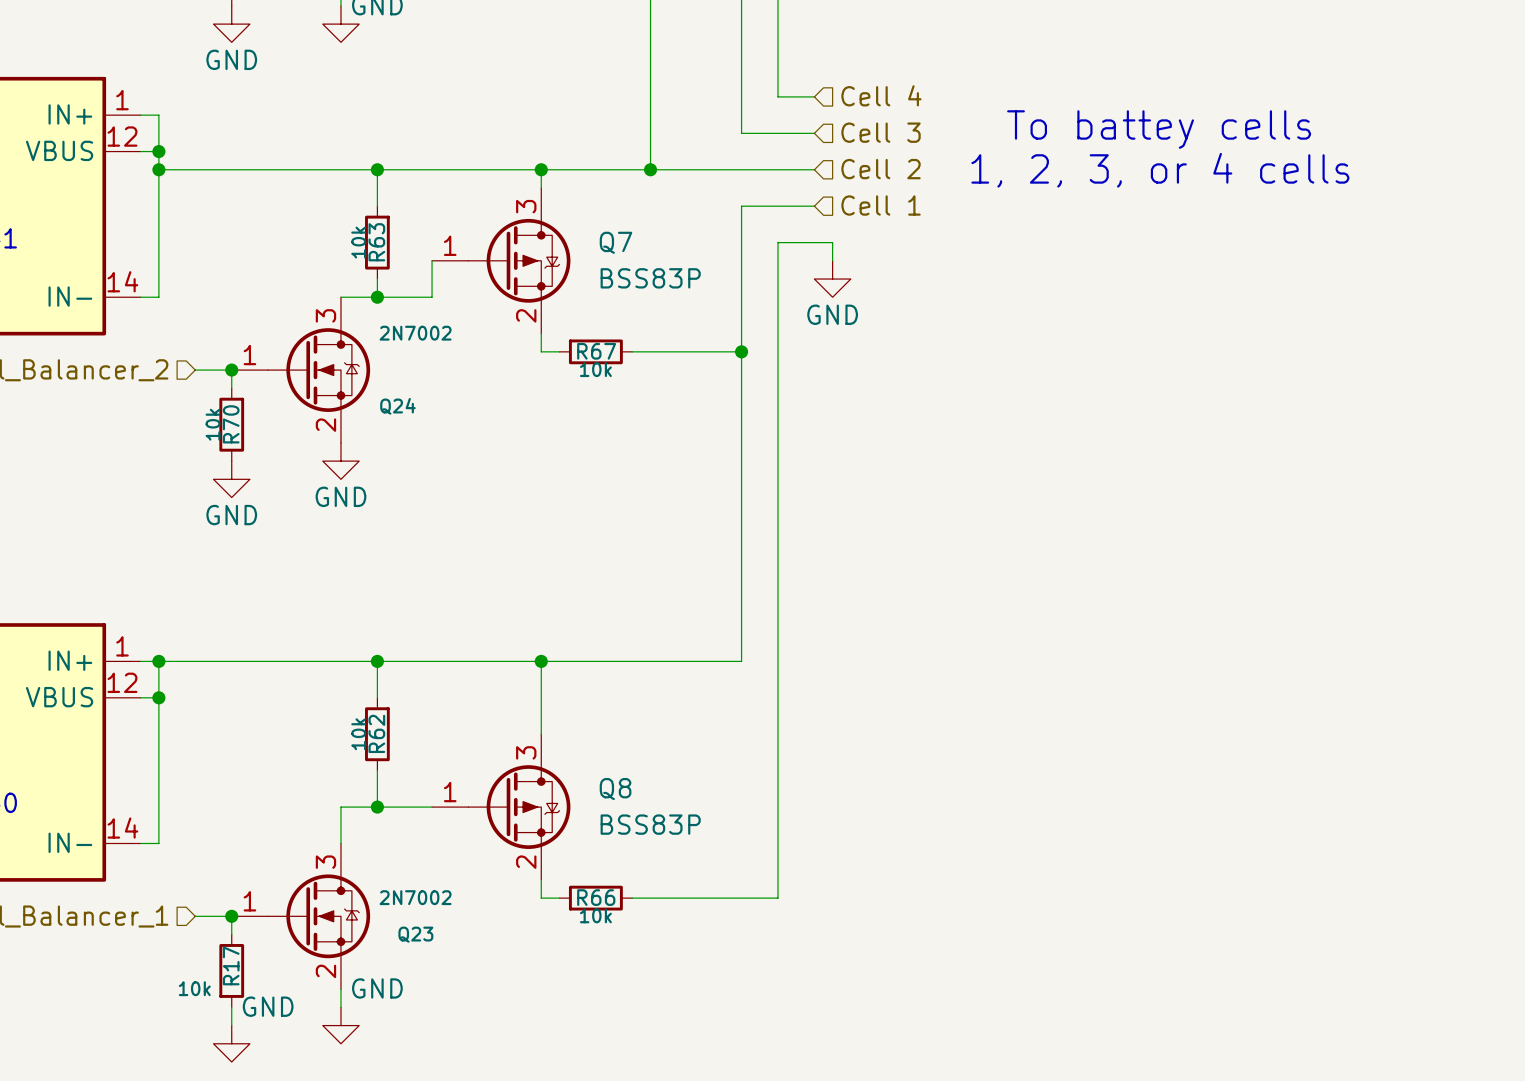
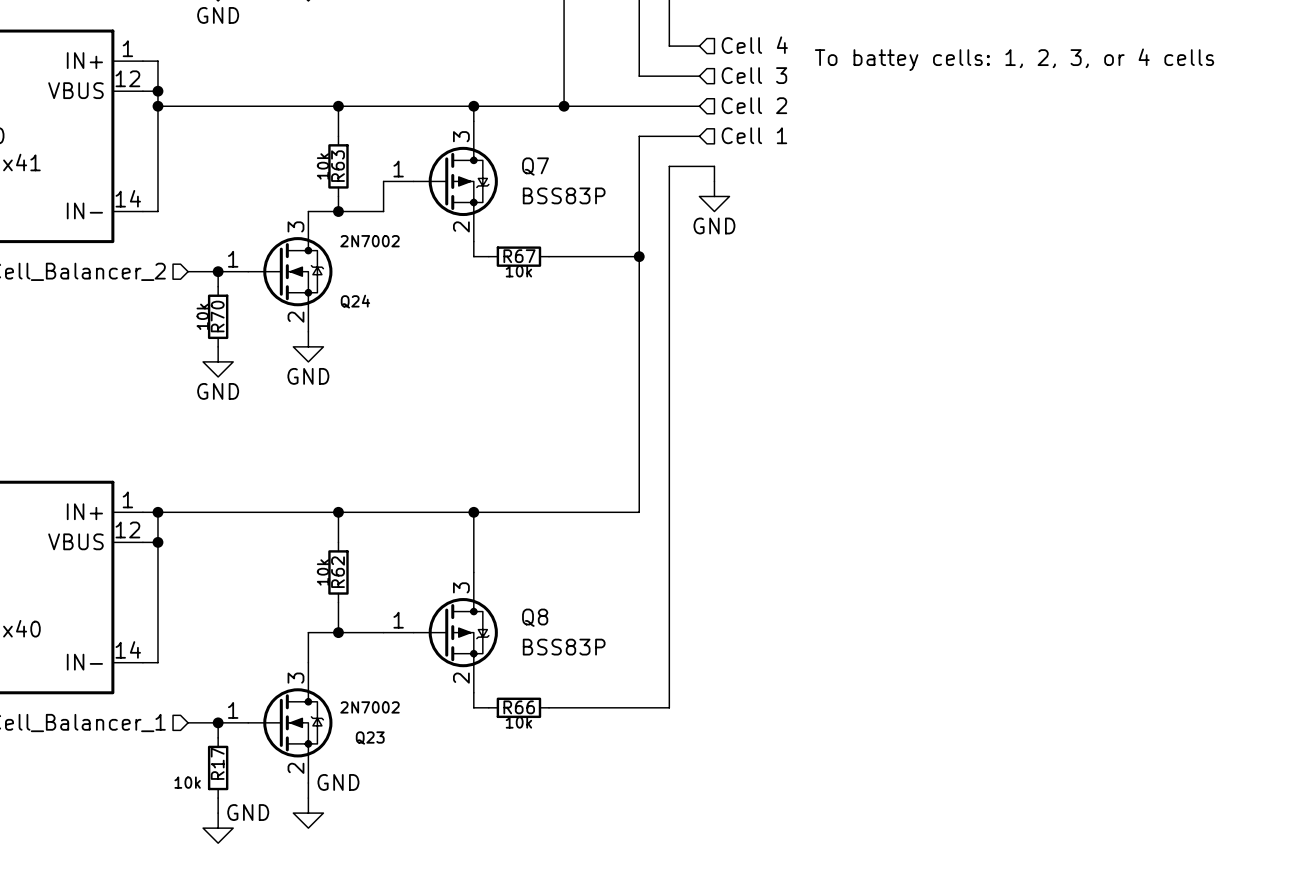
text: none -> To battey cells: 1, 2, 3, or 4 cells (1014, 59)
text: To battey cells (1159, 129) -> none
text: 1, 2, 3, or 4 cells (1160, 170) -> none
power symbol text position: GND (268, 1006) -> GND (248, 812)

